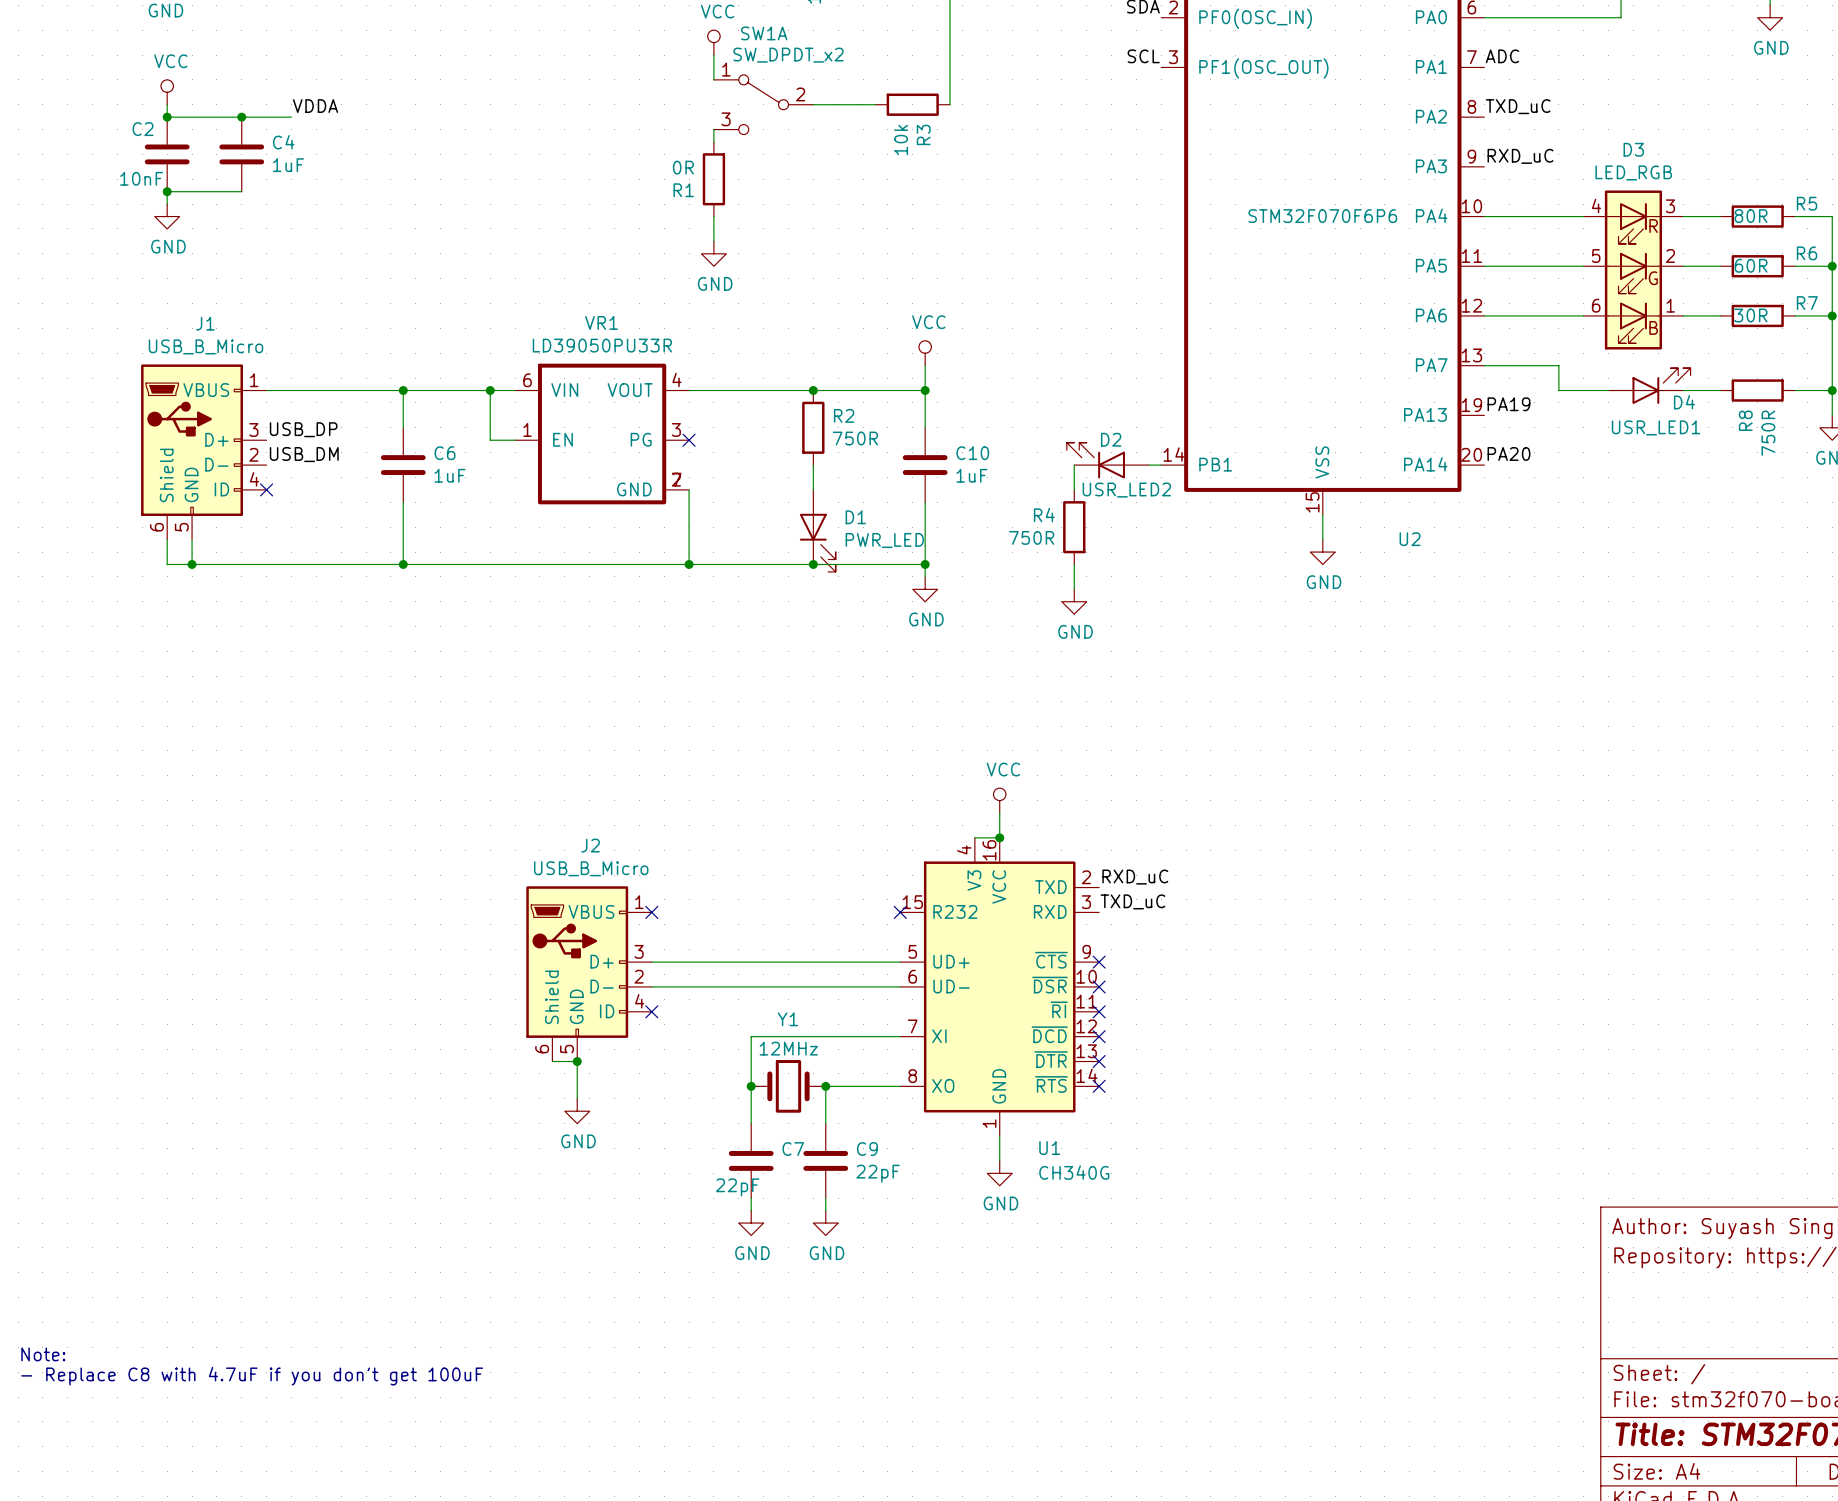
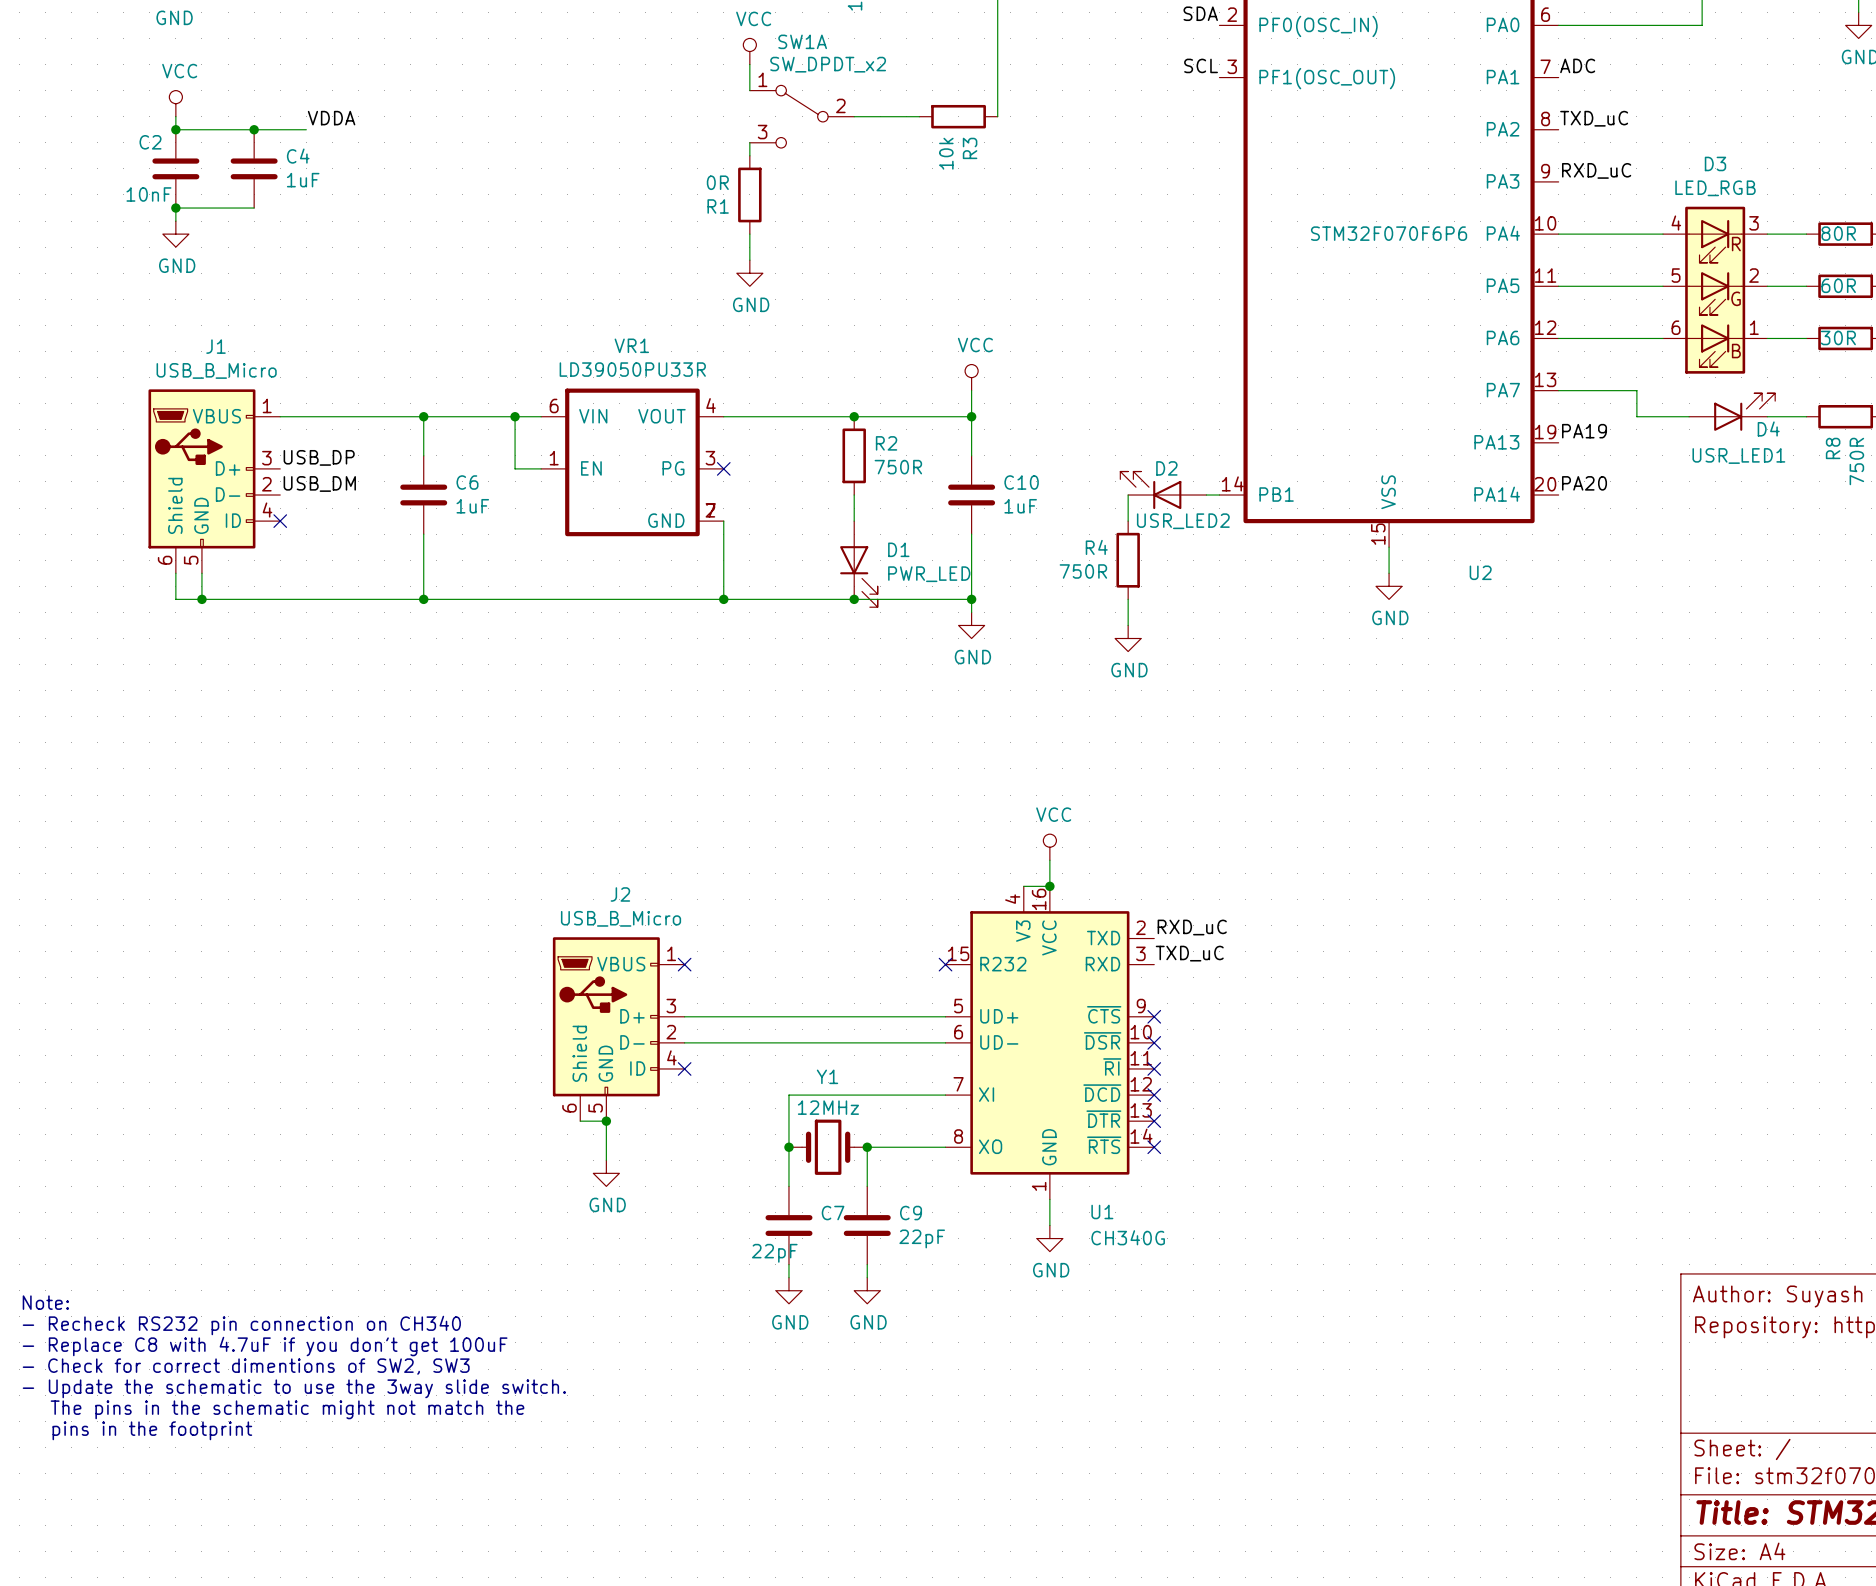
text: none -> Note: (45, 1302)
text: none -> - Recheck RS232 pin connection on CH340 (241, 1325)
text: none -> - Check for correct dimentions of SW2, SW3 (246, 1366)
text: none -> - Update the schematic to use the 3way slide switch. (294, 1388)
text: none -> The pins in the schematic might not match the (287, 1409)
text: Note: (43, 1354) -> pins in the footprint (152, 1430)
text position: - Replace C8 with 4.7uF if you don't get 100uF (252, 1376) -> - Replace C8 with 4.7uF if you don't get 100uF (265, 1346)

